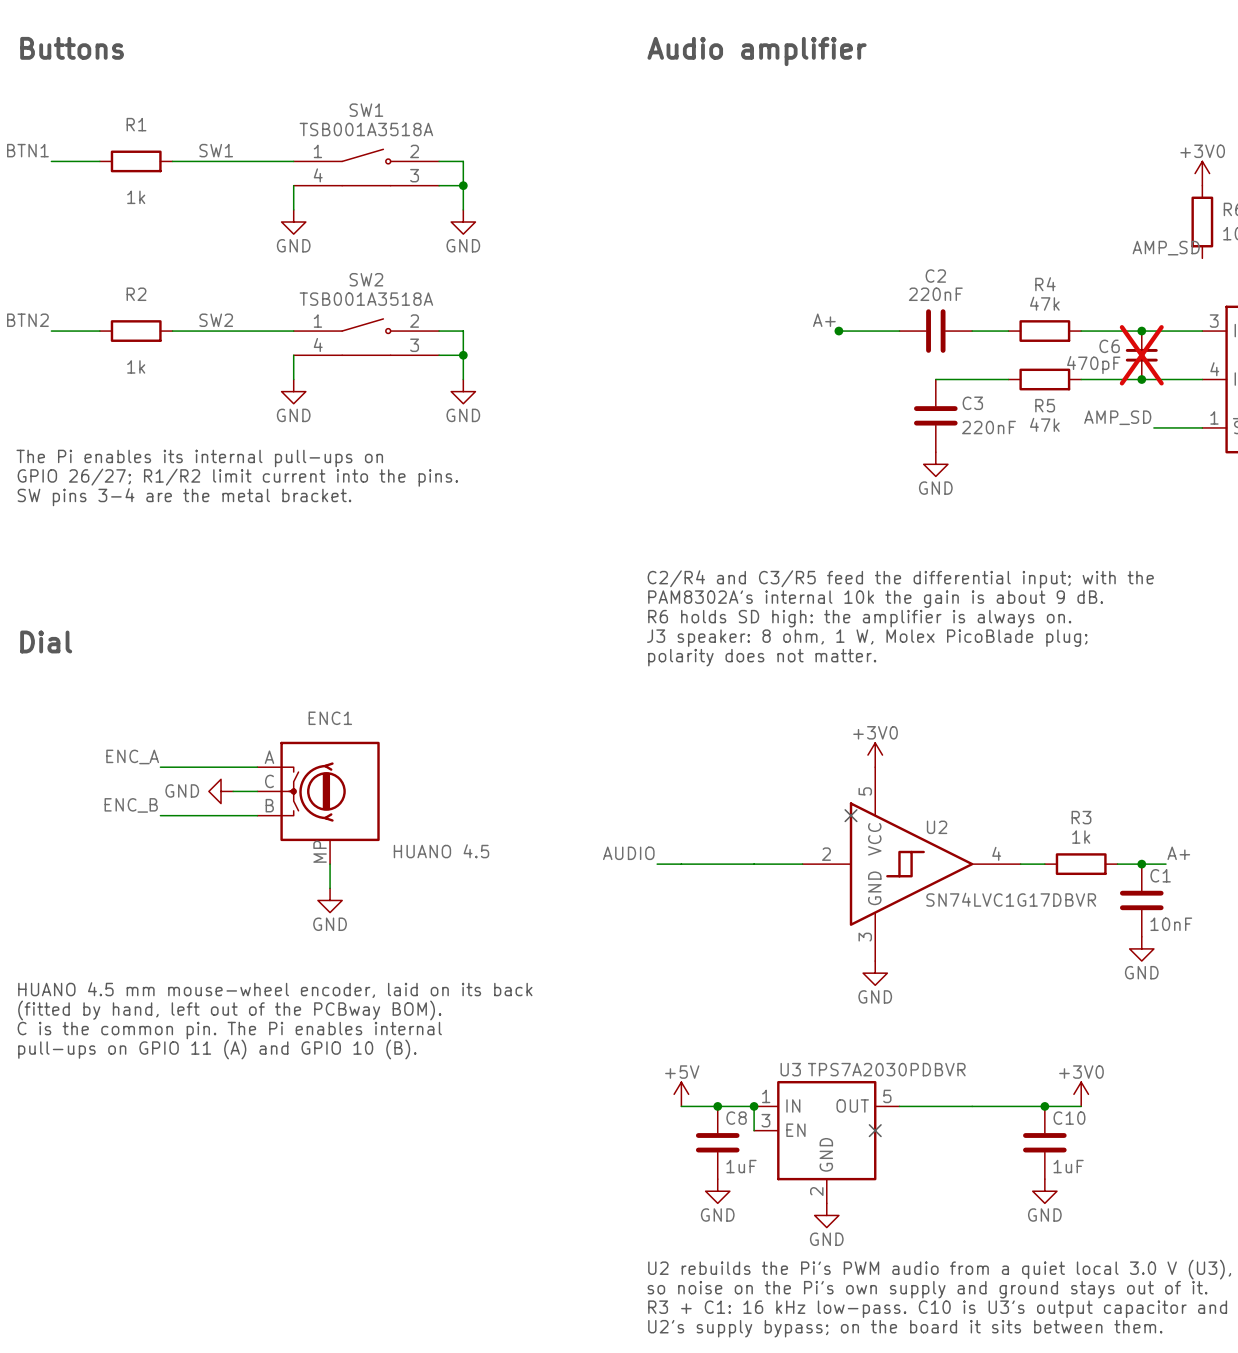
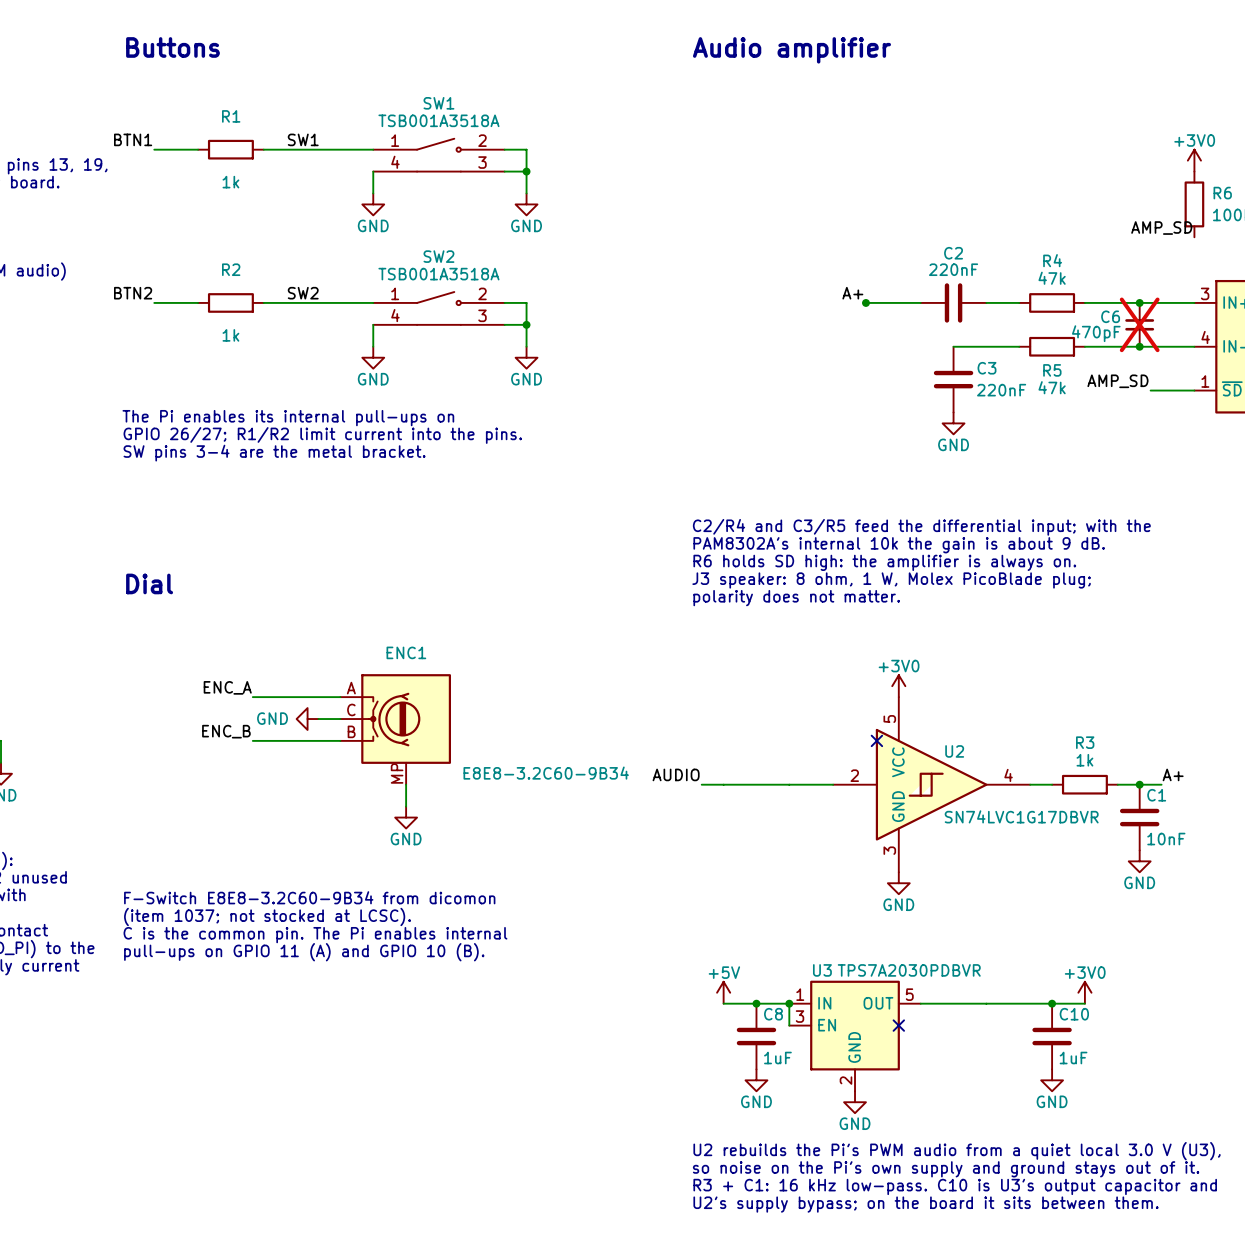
ENC1 value: HUANO 4.5 (441, 851) -> E8E8-3.2C60-9B34 (546, 773)
text: HUANO 4.5 mm mouse-wheel encoder, laid on its back (275, 990) -> F-Switch E8E8-3.2C60-9B34 from dicomon (309, 897)
text: (fitted by hand, left out of the PCBway BOM). (229, 1010) -> (item 1037; not stocked at LCSC). (267, 916)

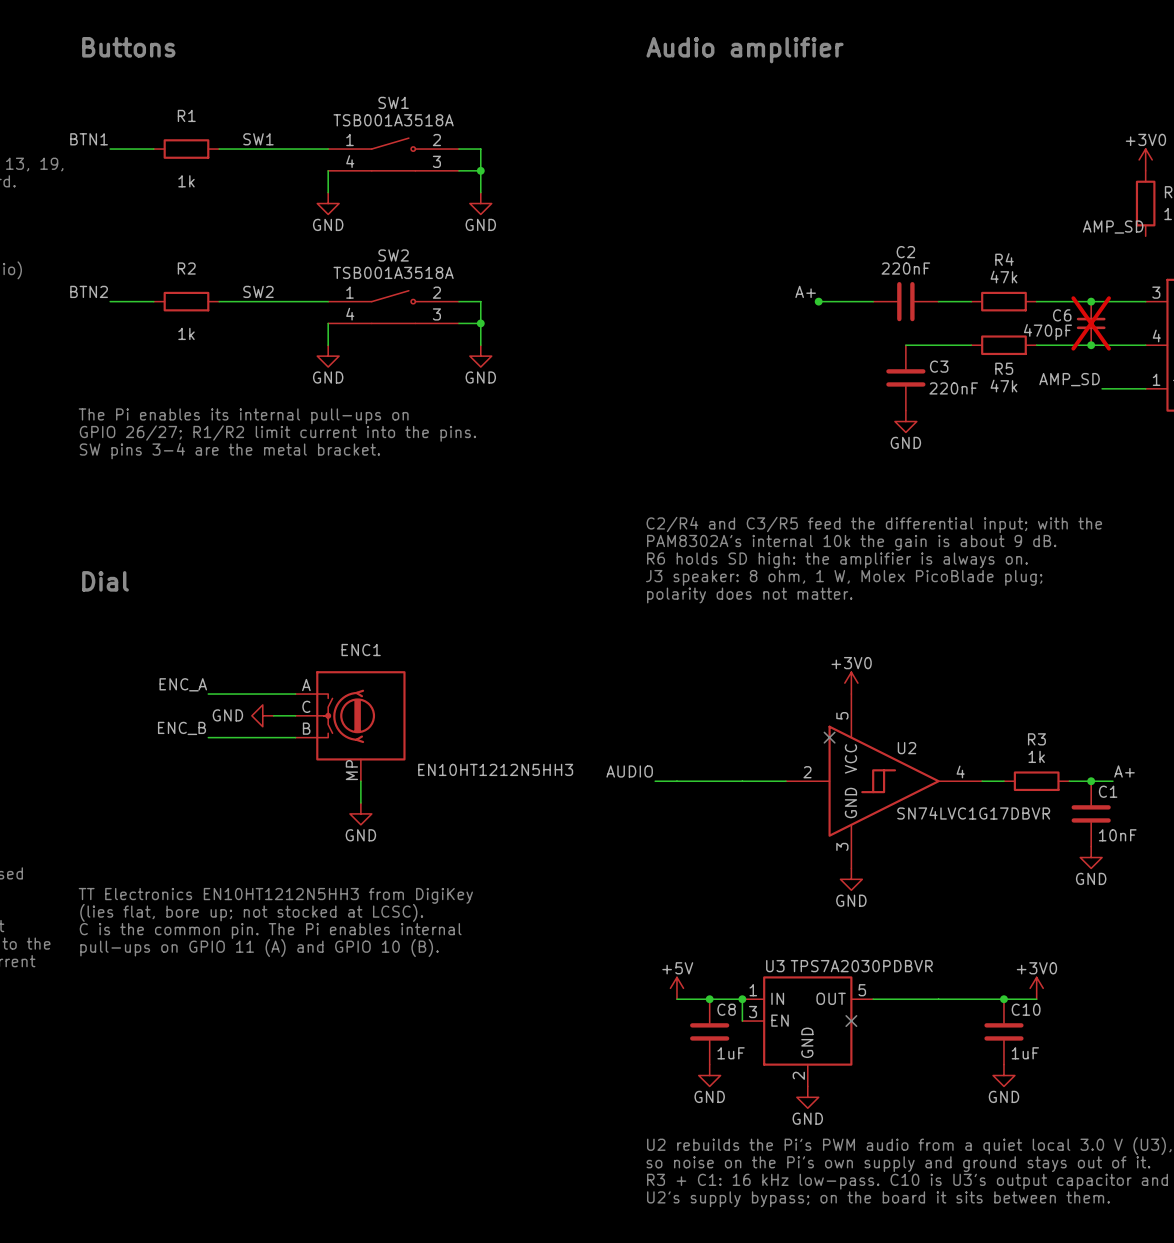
ENC1 value: E8E8-3.2C60-9B34 (546, 773) -> EN10HT1212N5HH3 (495, 769)
text: F-Switch E8E8-3.2C60-9B34 from dicomon (309, 897) -> TT Electronics EN10HT1212N5HH3 from DigiKey (275, 895)
text: (item 1037; not stocked at LCSC). (267, 916) -> (lies flat, bore up; not stocked at LCSC). (251, 912)

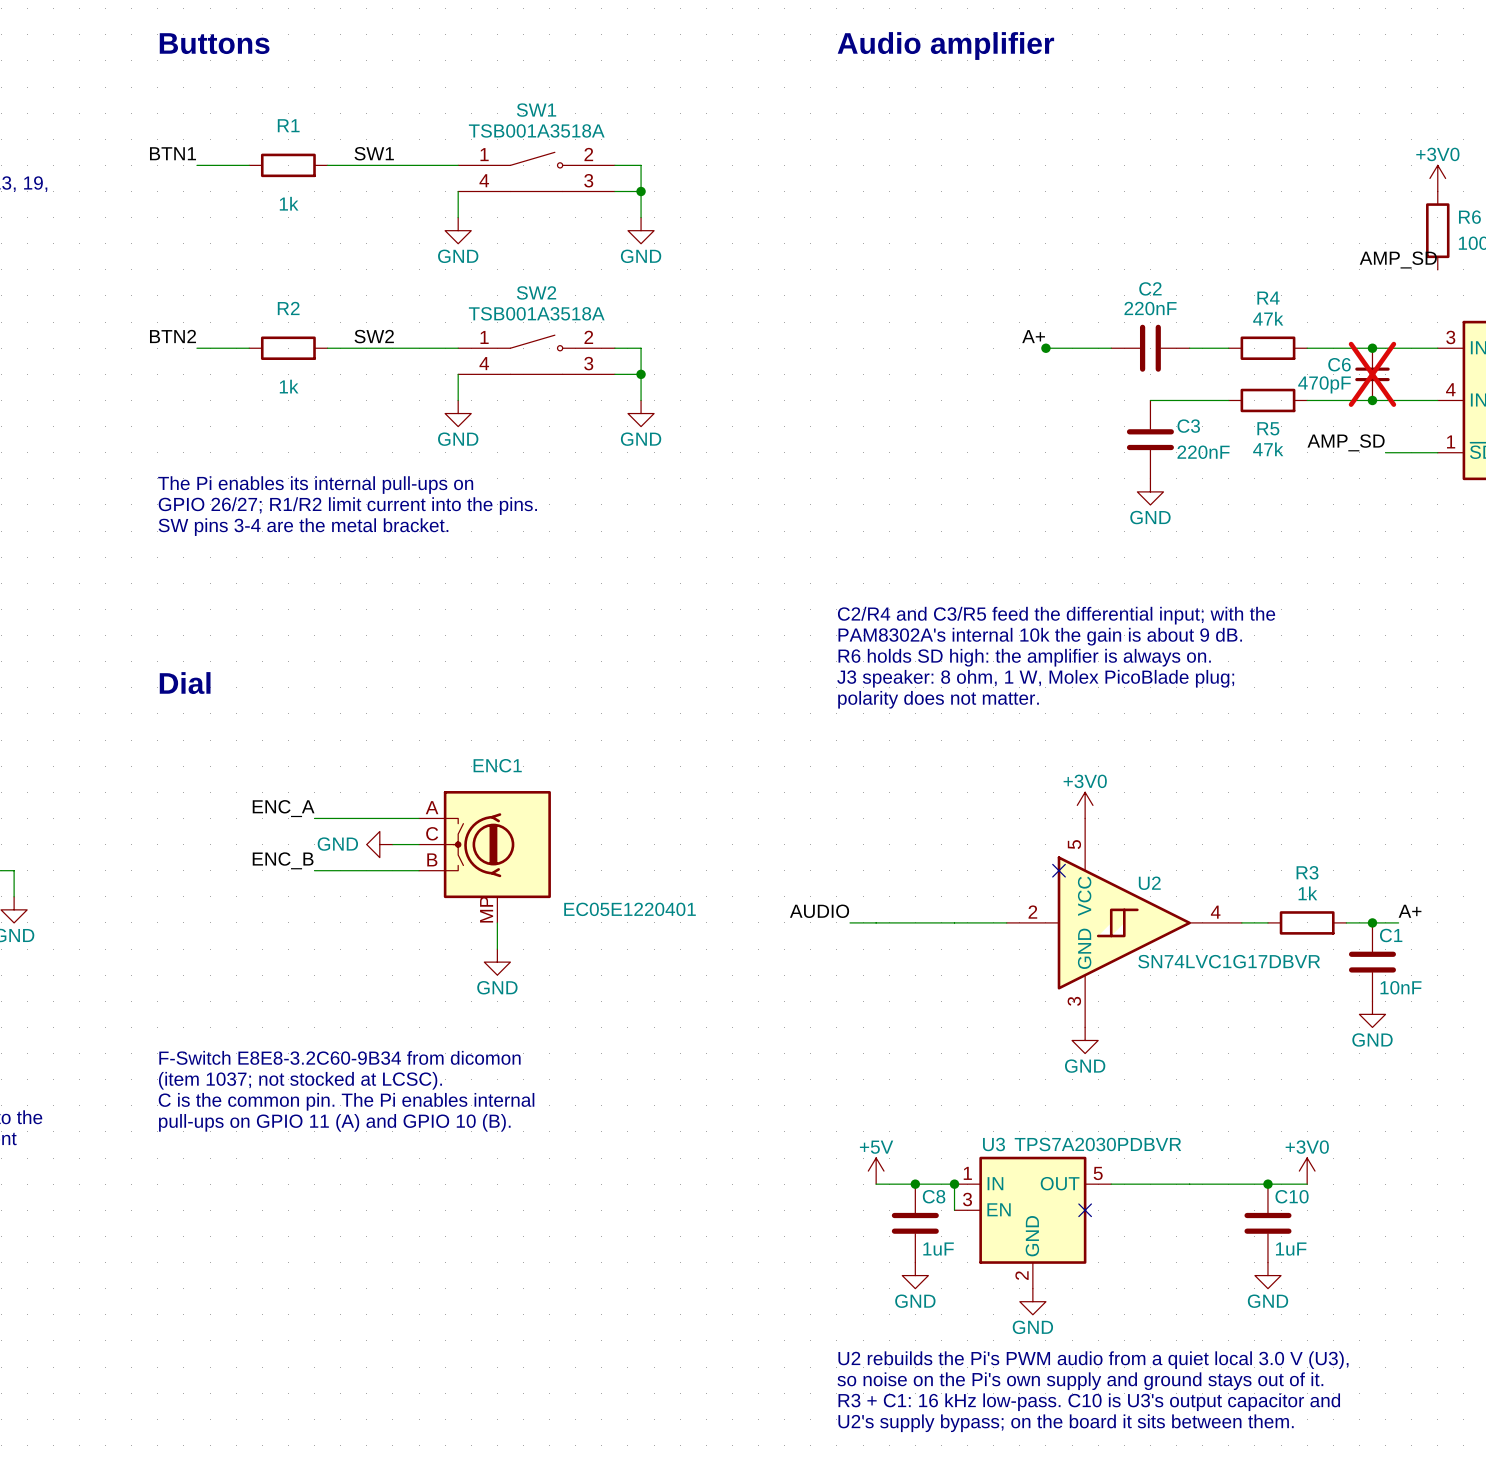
ENC1 value: EN10HT1212N5HH3 (495, 769) -> EC05E1220401 (630, 909)
text: TT Electronics EN10HT1212N5HH3 from DigiKey (275, 895) -> F-Switch E8E8-3.2C60-9B34 from dicomon (339, 1057)
text: (lies flat, bore up; not stocked at LCSC). (251, 912) -> (item 1037; not stocked at LCSC). (300, 1080)

